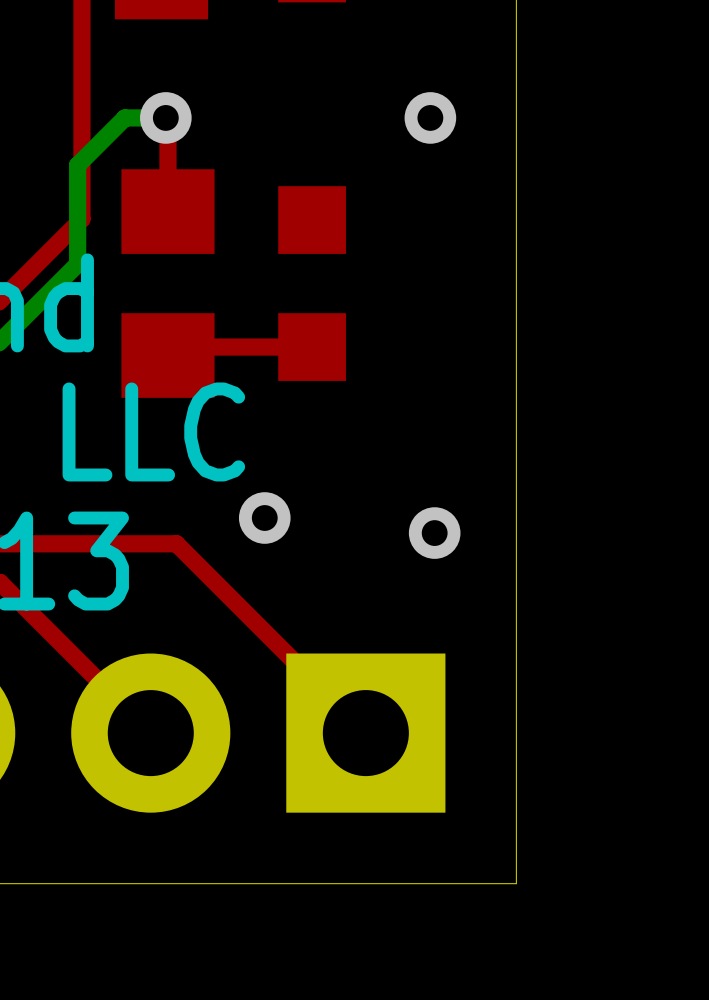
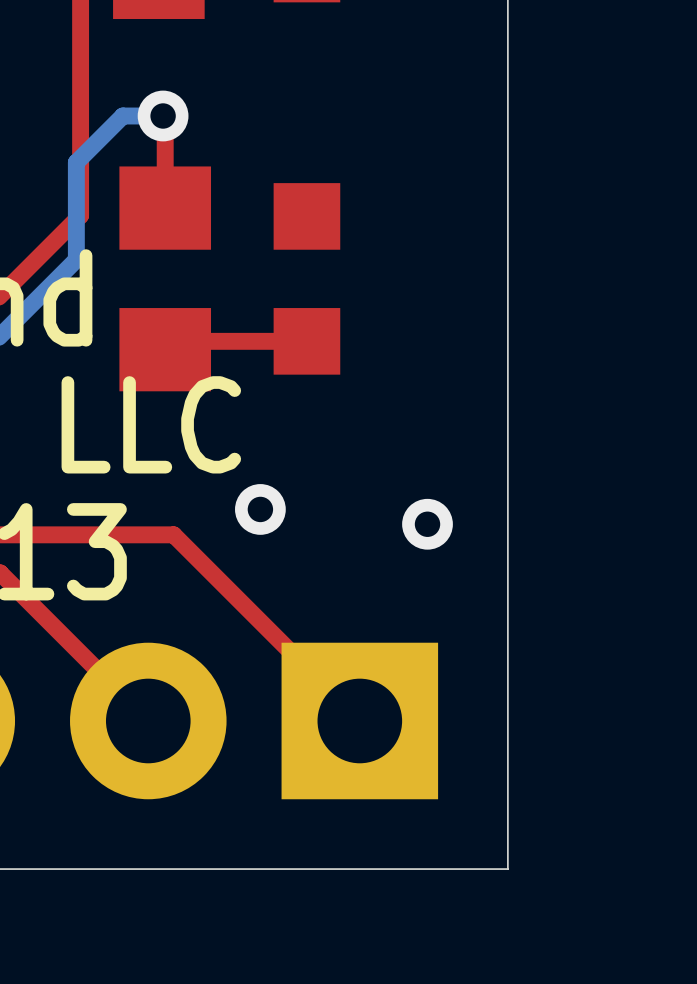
via: (430, 117) -> none

